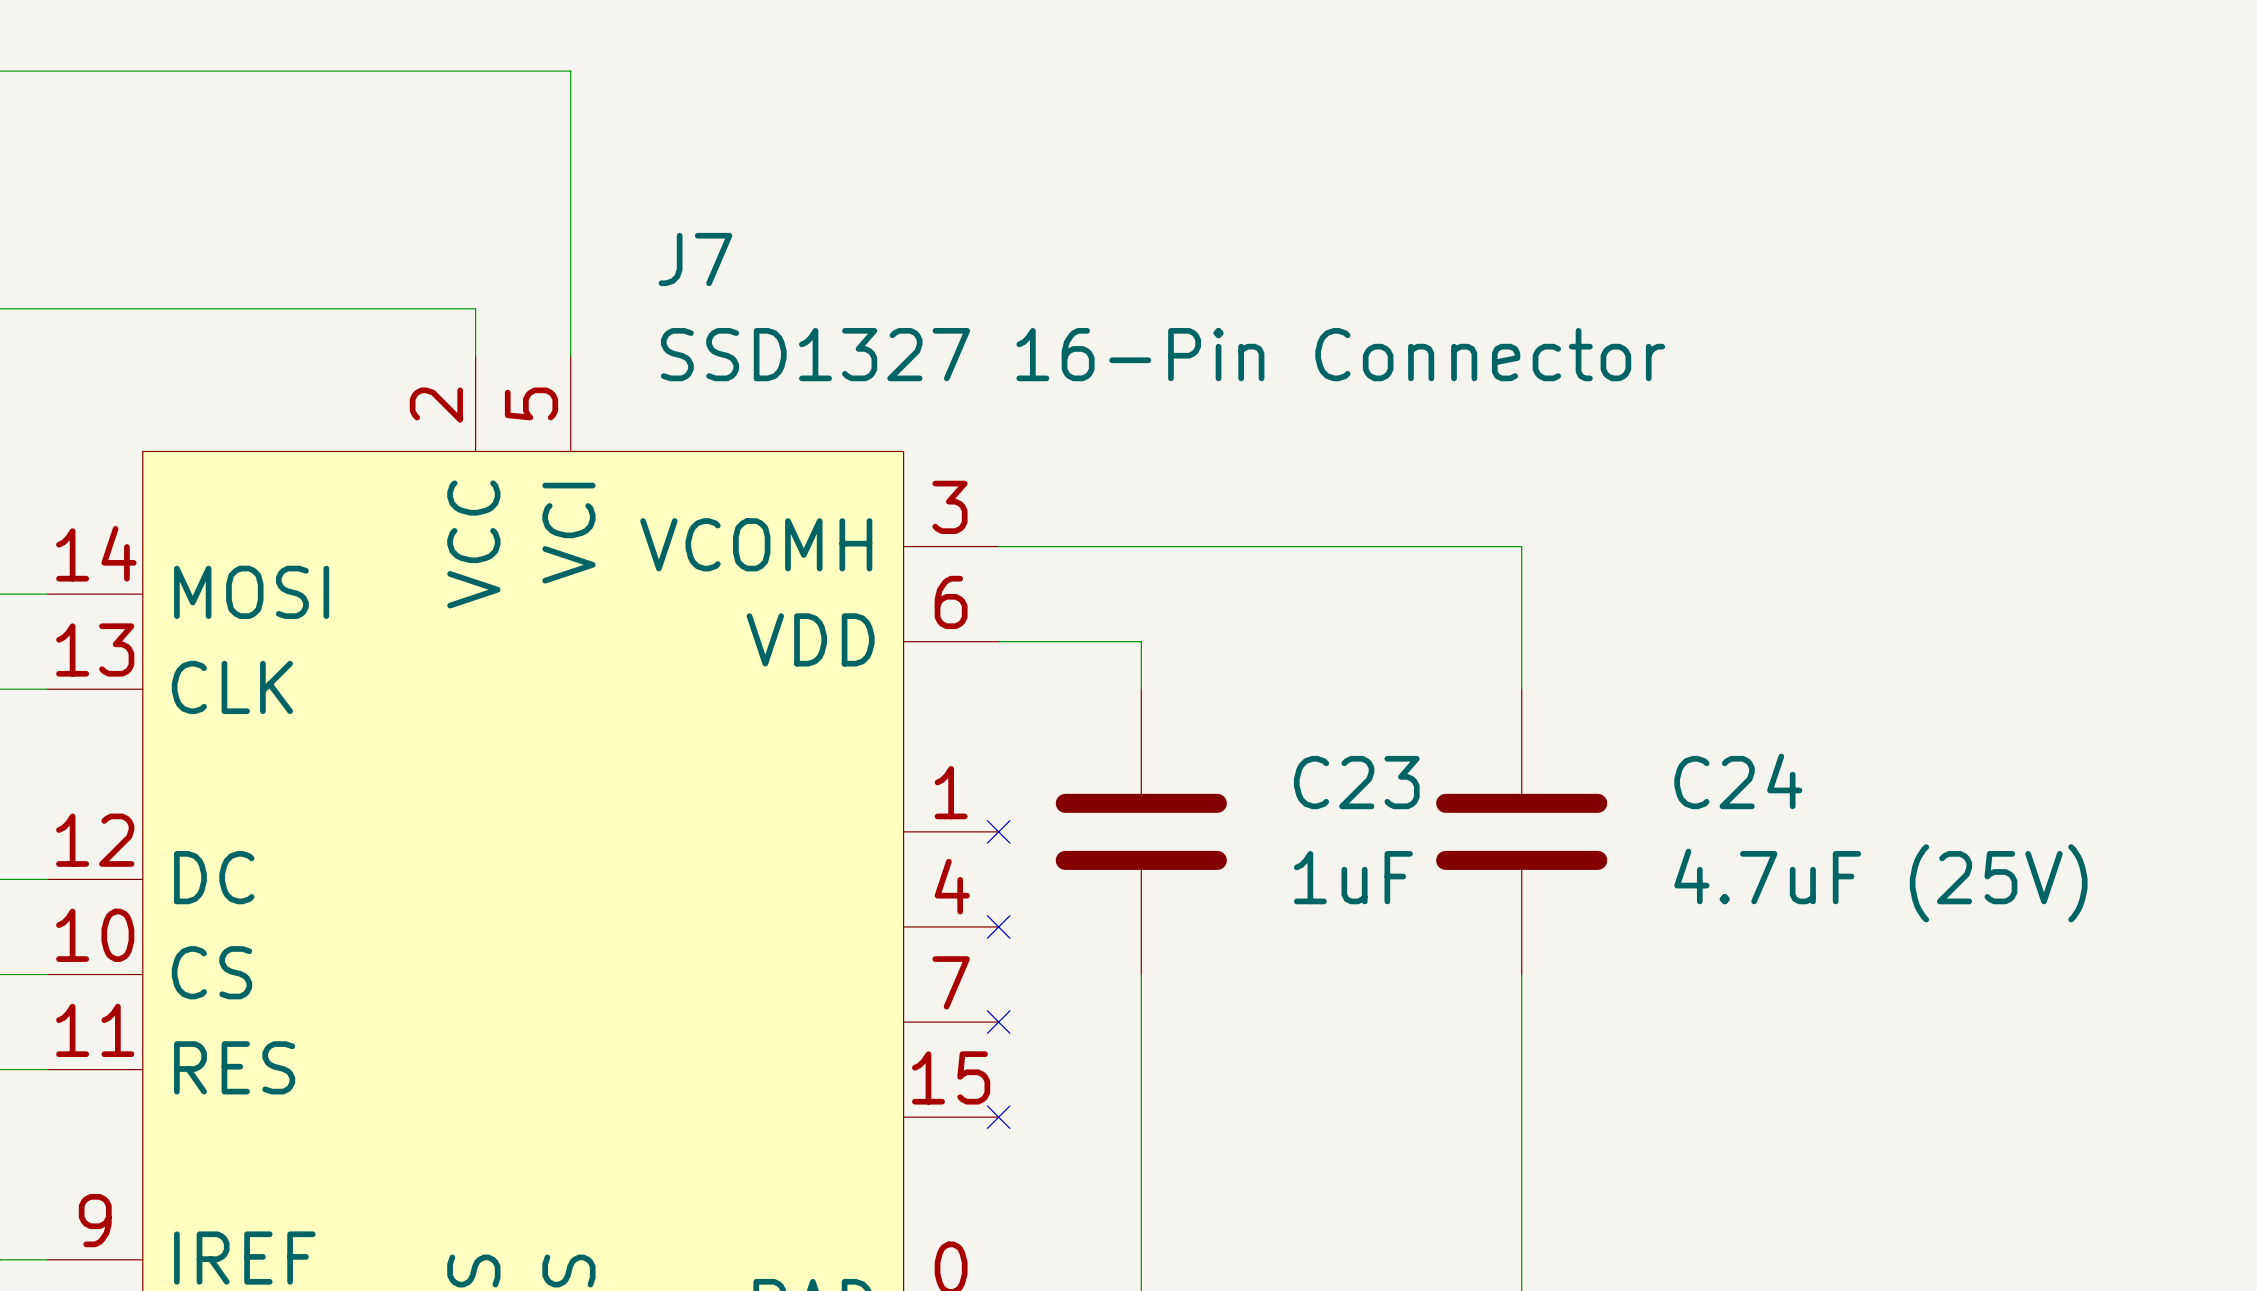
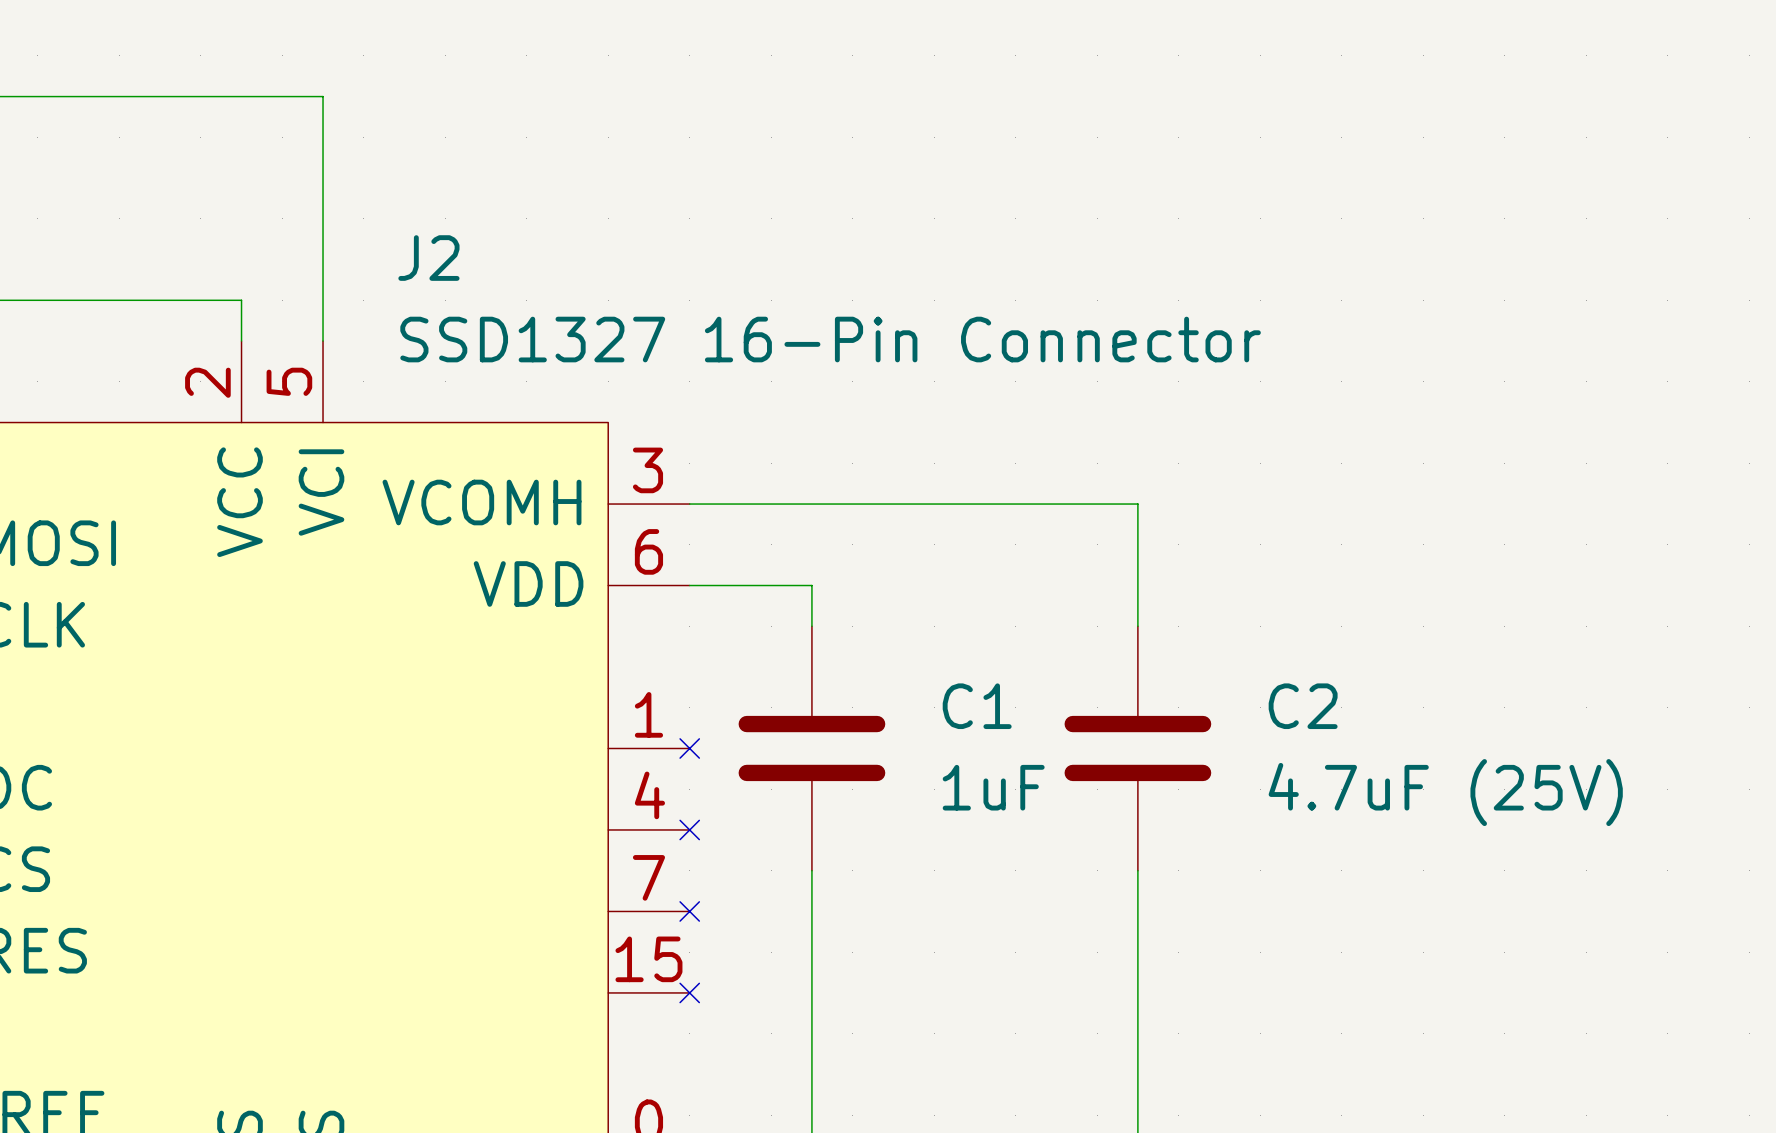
J7 name: J7 (695, 259) -> J2 (428, 258)
C24 name: C24 (1738, 781) -> C2 (1303, 706)
C23 name: C23 (1356, 782) -> C1 (977, 706)

